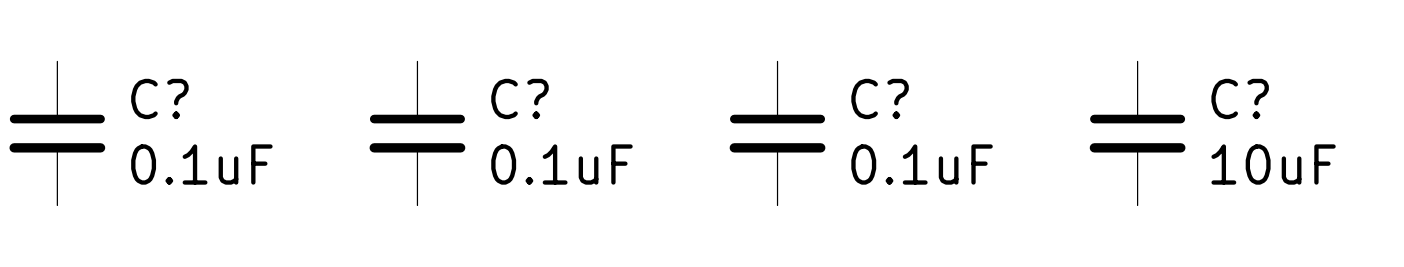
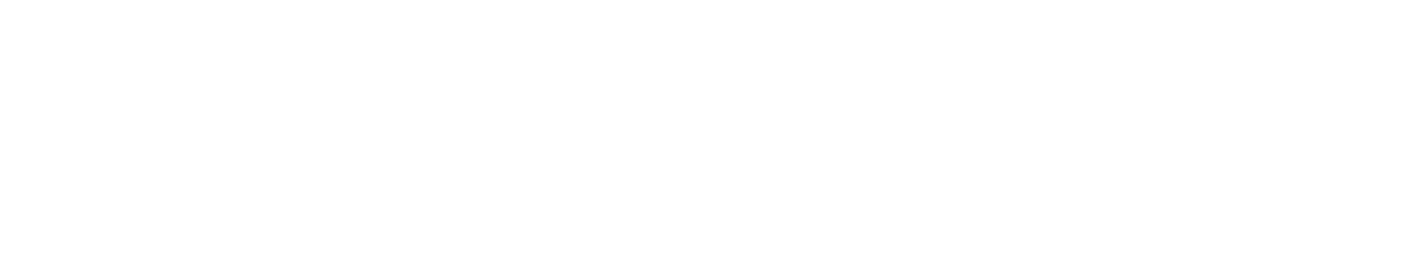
C?: 0.1uF (57, 133) -> none
C?: 0.1uF (417, 133) -> none
C?: 0.1uF (777, 133) -> none
C?: 10uF (1137, 133) -> none

